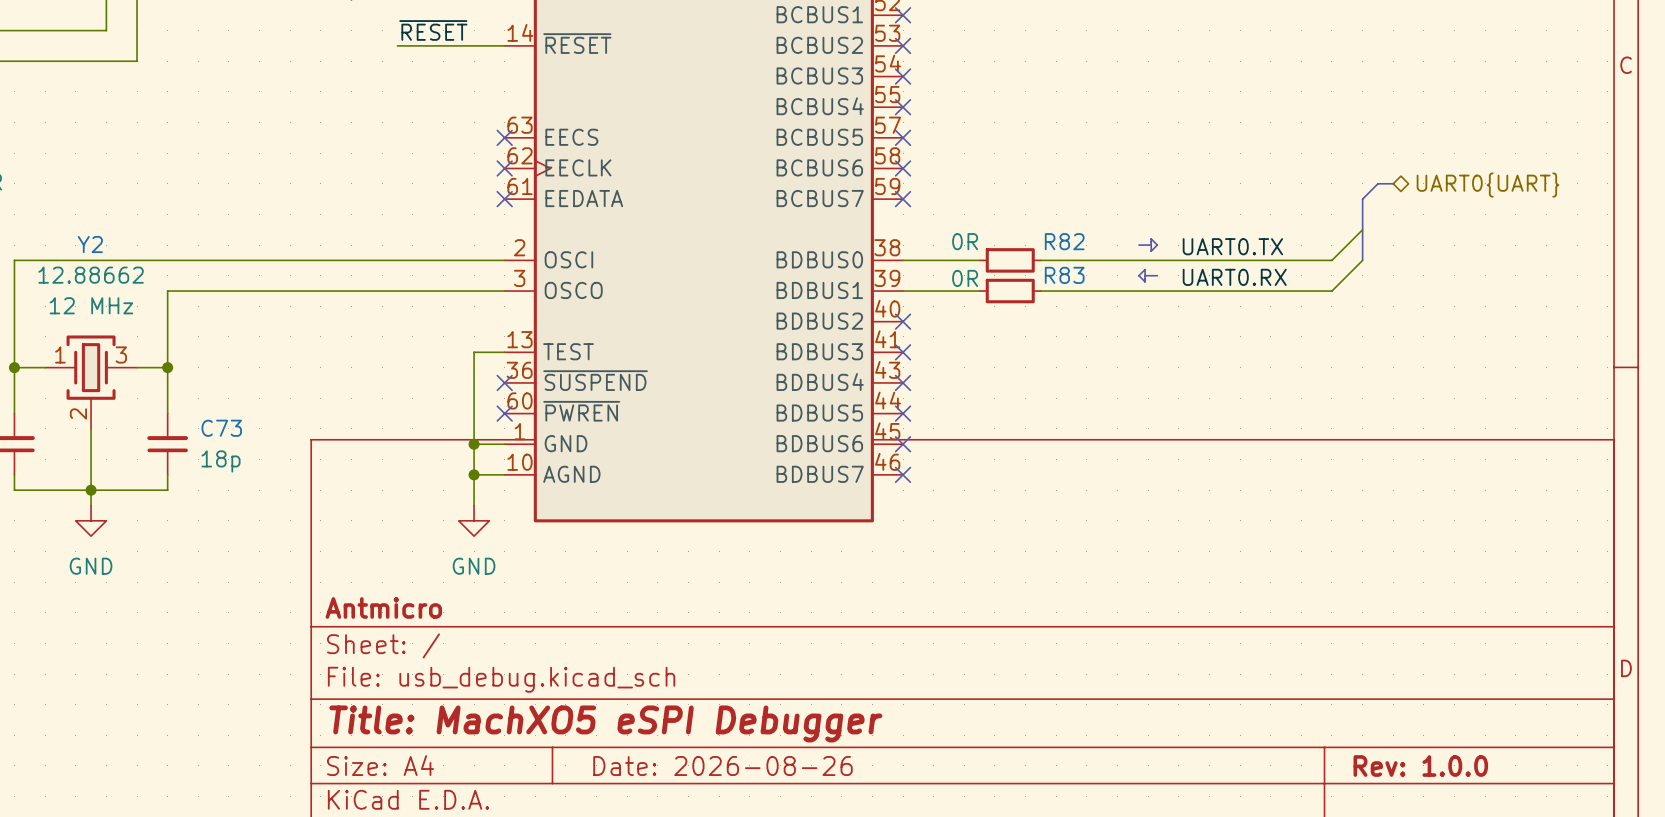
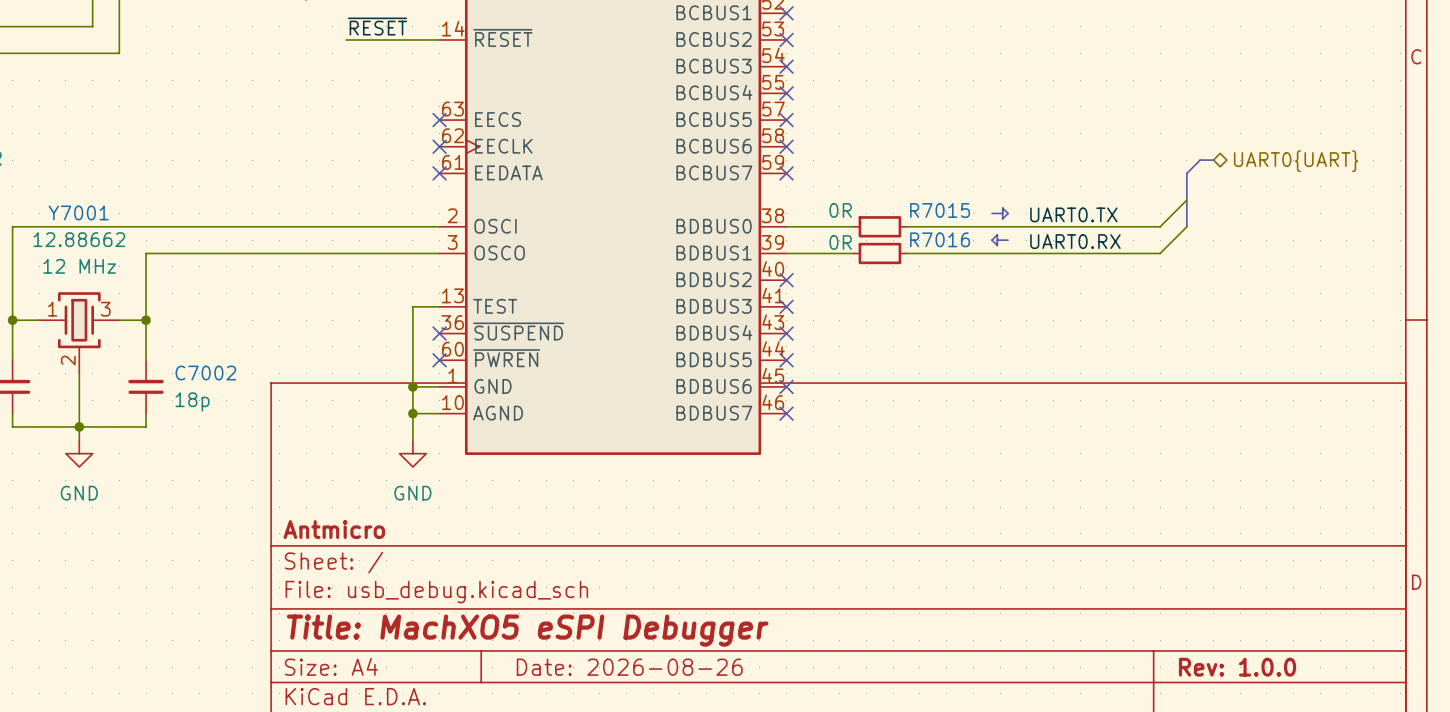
R82 name: R82 (1064, 241) -> R7015 (940, 210)
Y2 name: Y2 (90, 244) -> Y7001 (78, 212)
R83 name: R83 (1064, 275) -> R7016 (940, 239)
C73 name: C73 (221, 428) -> C7002 (205, 373)

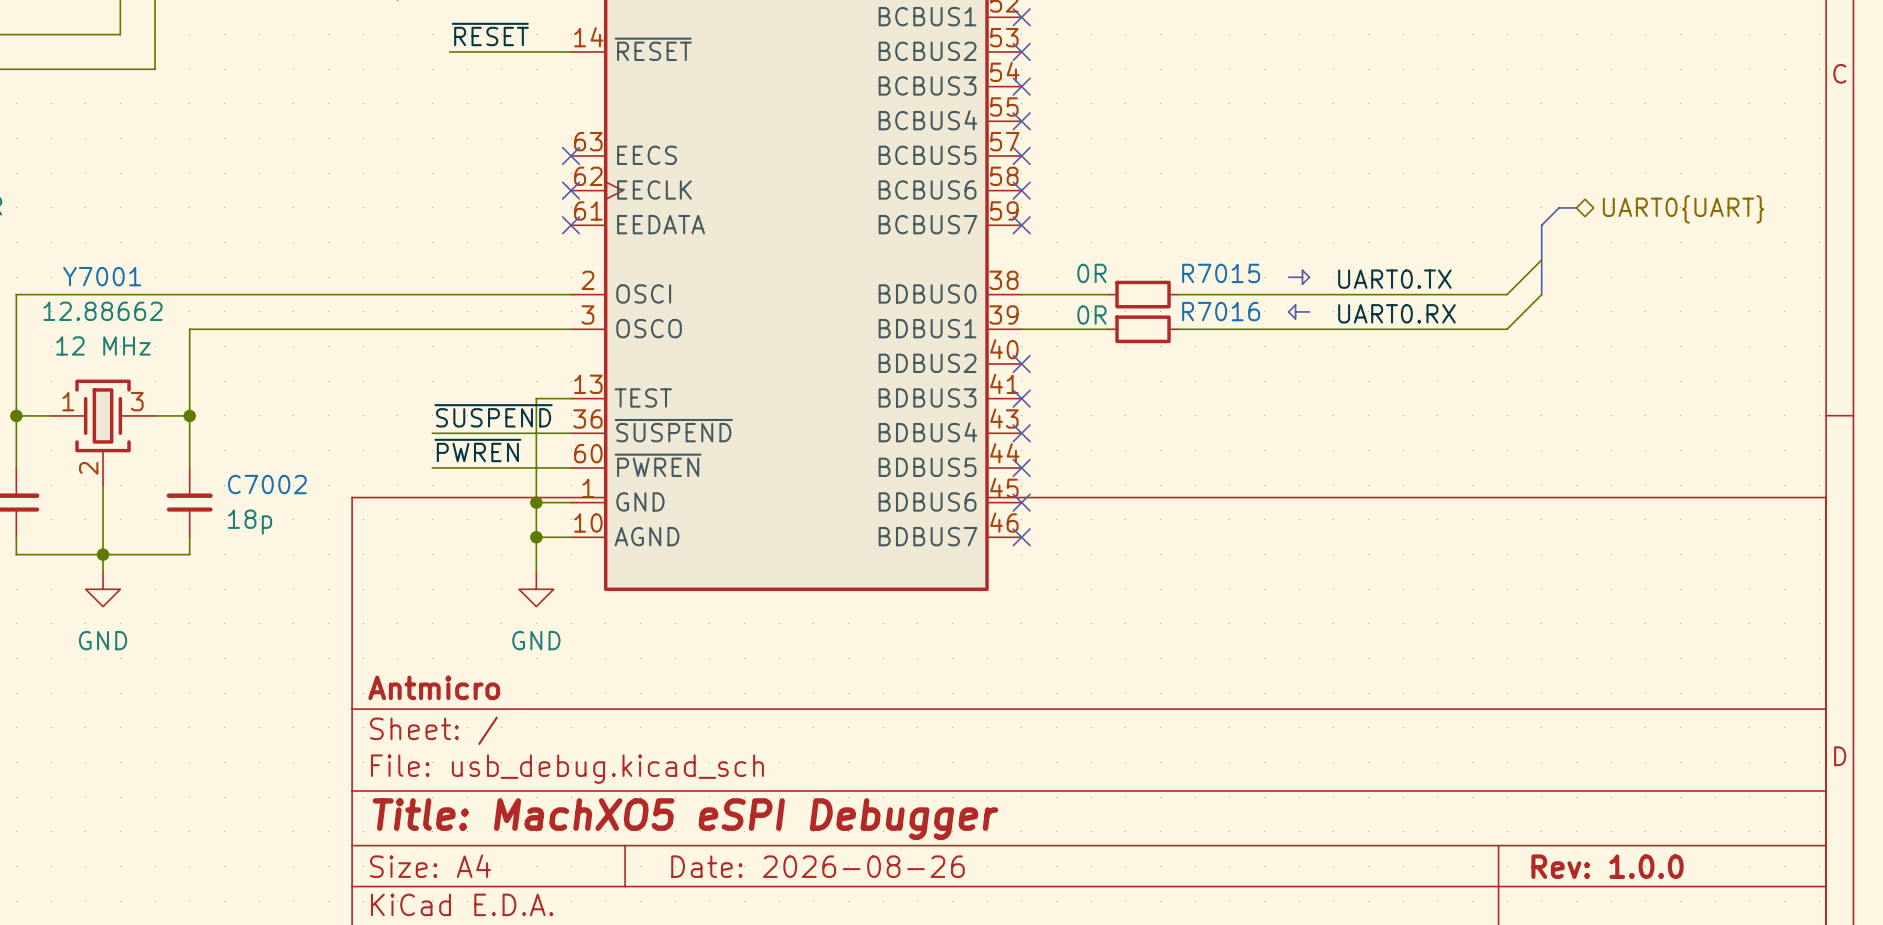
label: none -> ~{SUSPEND} (493, 415)
wire: none -> (432, 433) (571, 433)
no-connect mark: (439, 333) -> none
label: none -> ~{PWREN} (477, 450)
wire: none -> (432, 467) (571, 467)
no-connect mark: (439, 360) -> none

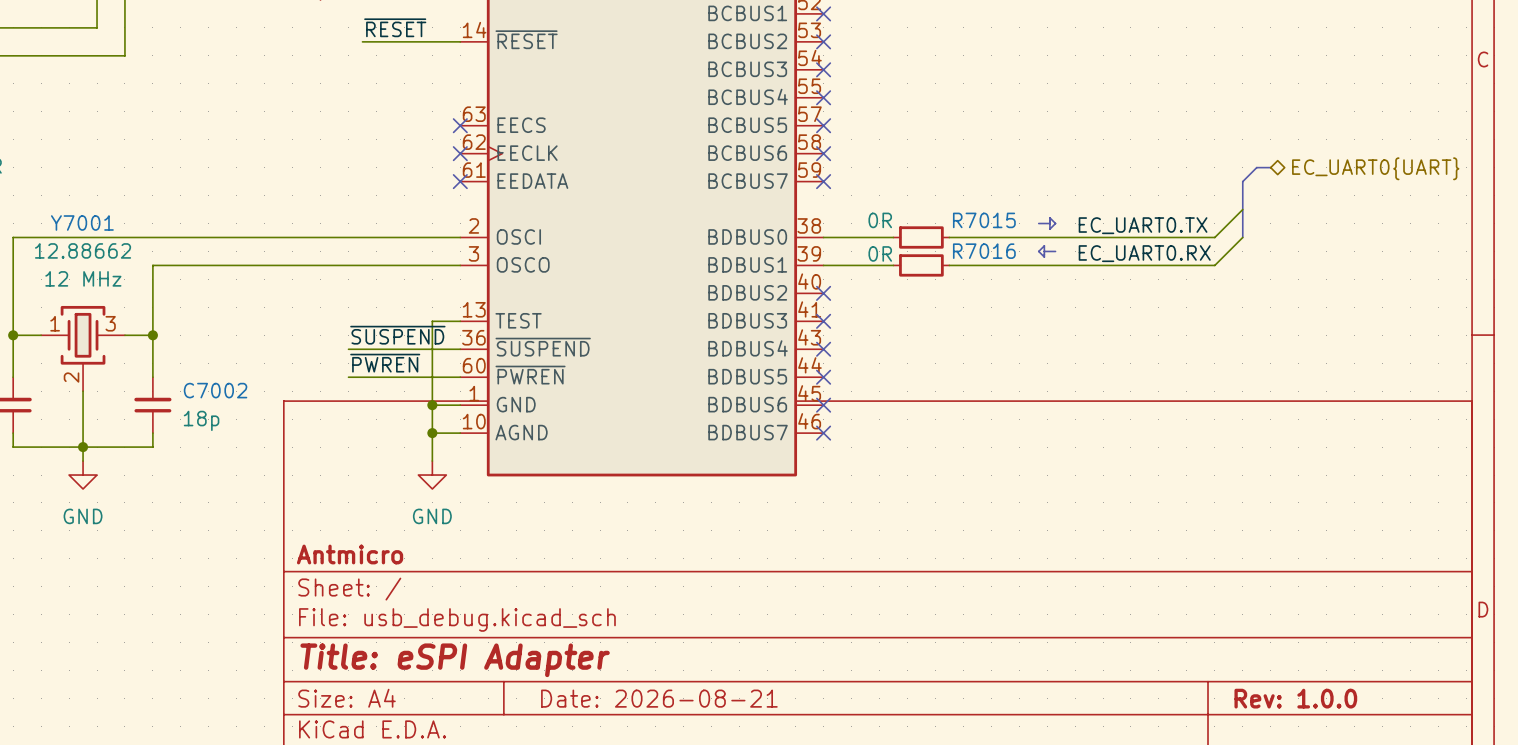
hierarchical label: UART0{UART} (1683, 209) -> EC_UART0{UART} (1375, 168)
label: UART0.TX (1394, 279) -> EC_UART0.TX (1143, 225)
label: UART0.RX (1396, 313) -> EC_UART0.RX (1144, 253)
title block: Title: MachXO5 eSPI Debugger (685, 819) -> Title: eSPI Adapter (455, 660)
title block: Date: 2026-08-26 (818, 866) -> Date: 2026-08-21 (659, 698)

